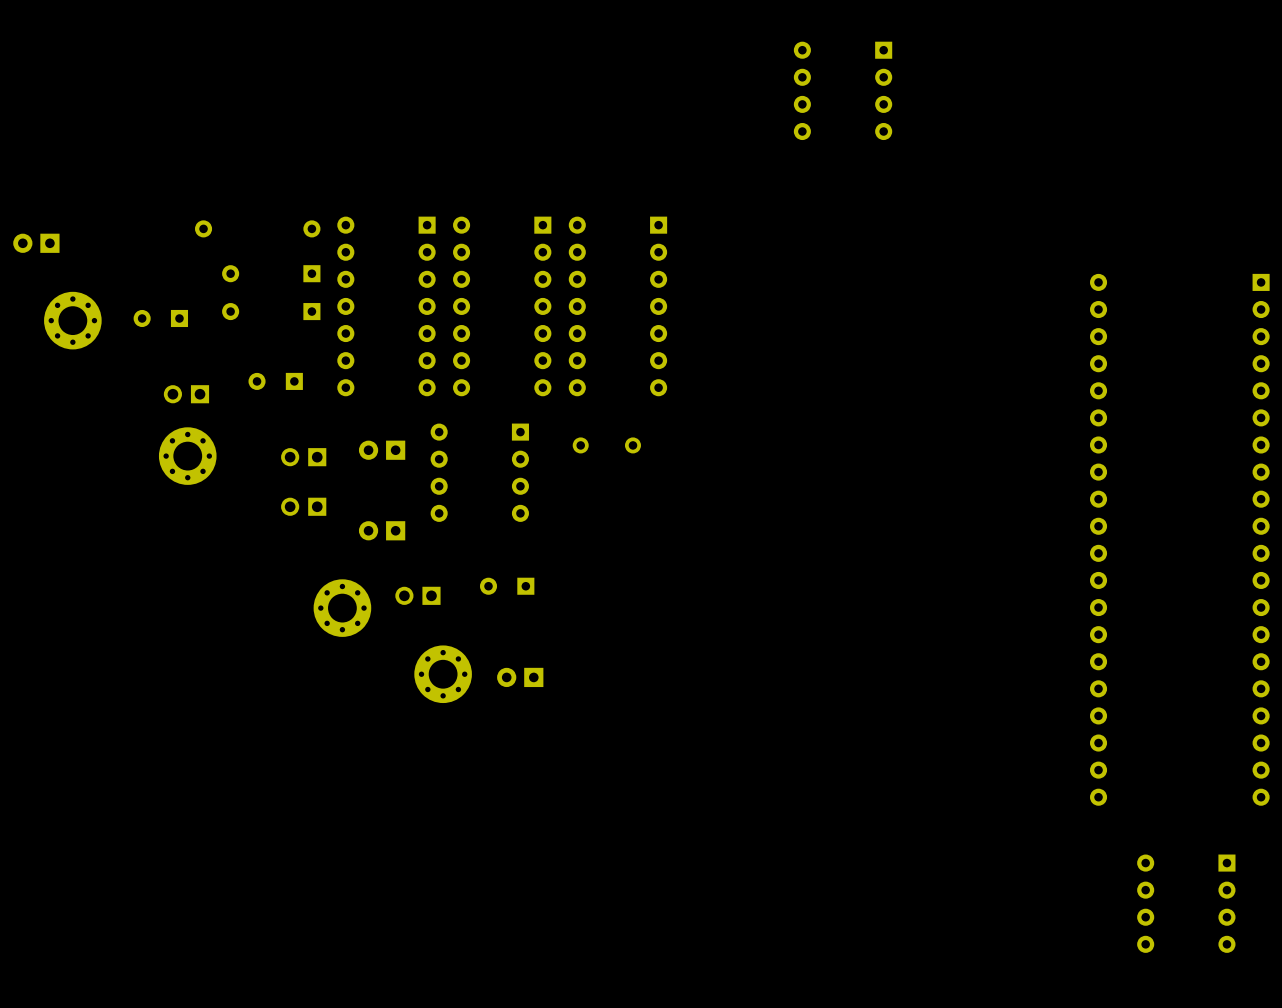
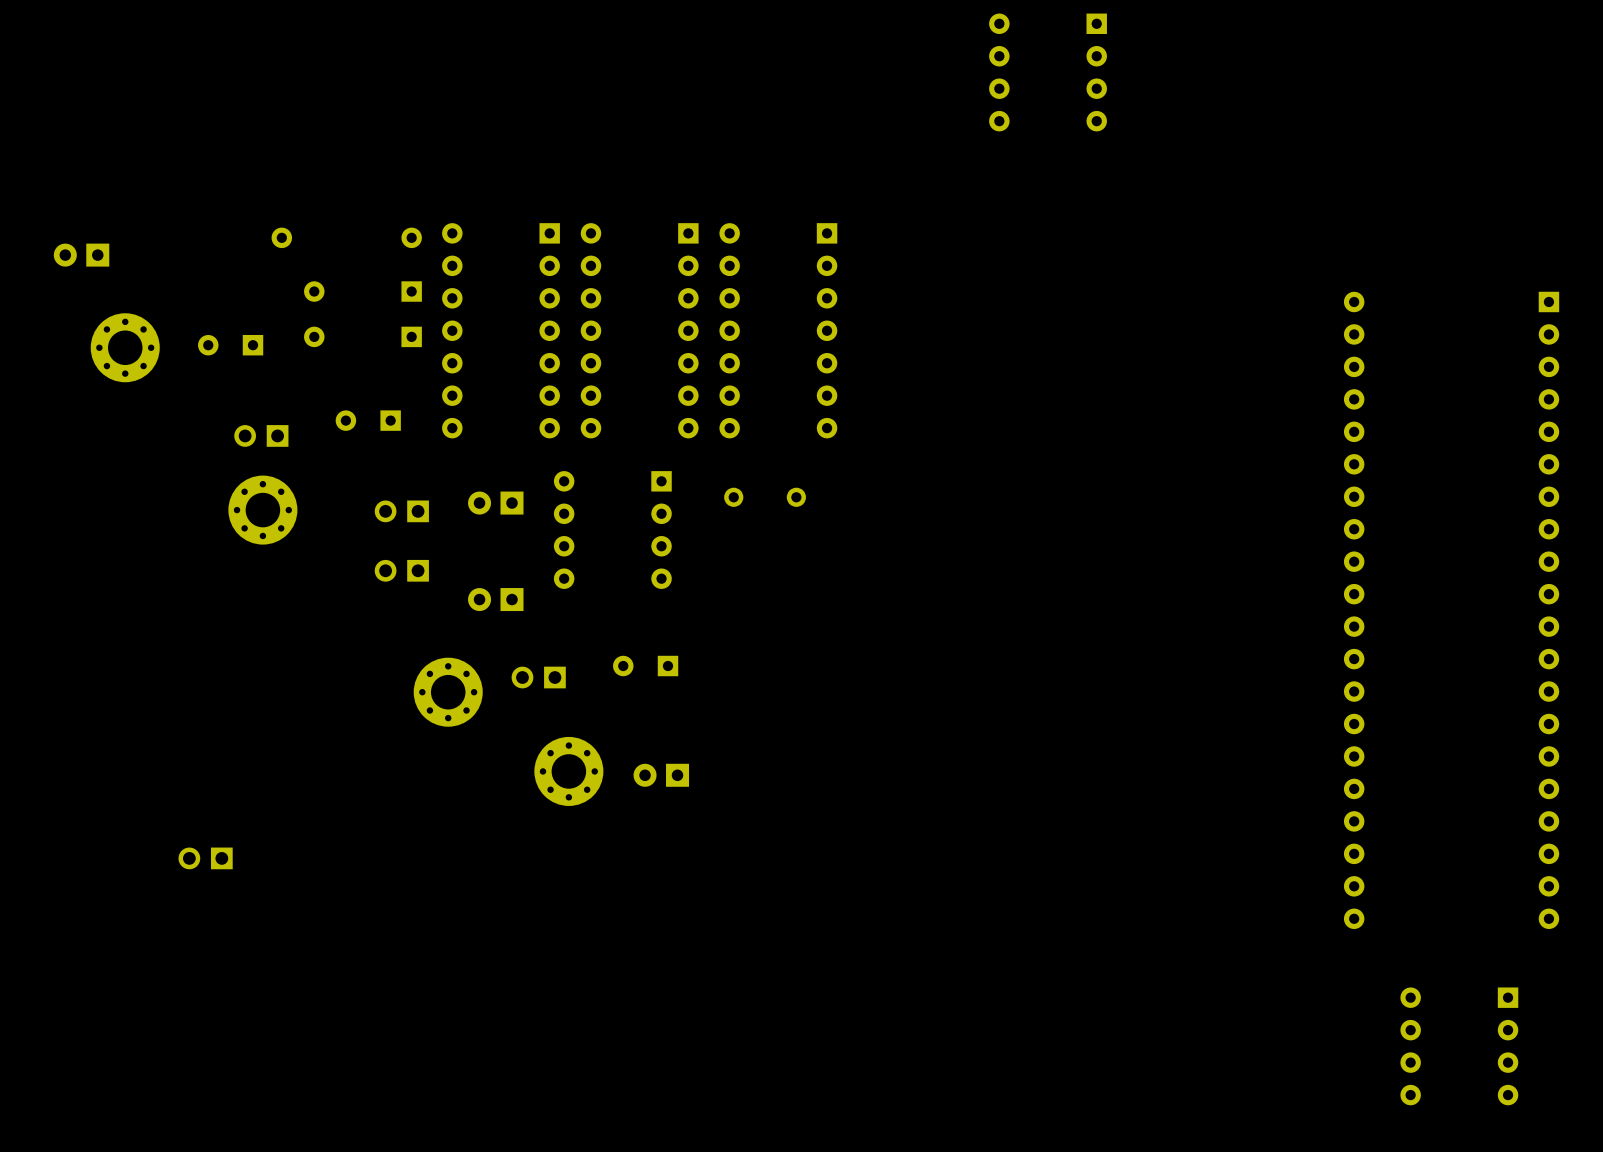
part: none -> (205, 858)

